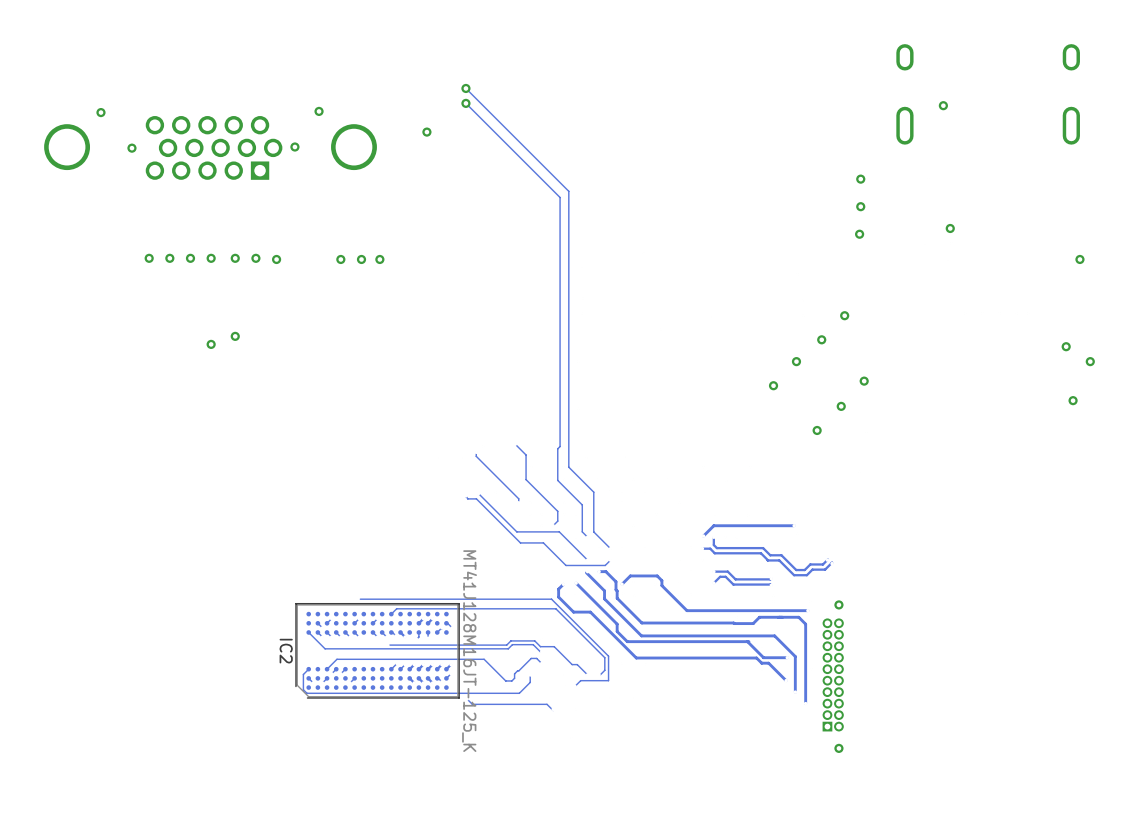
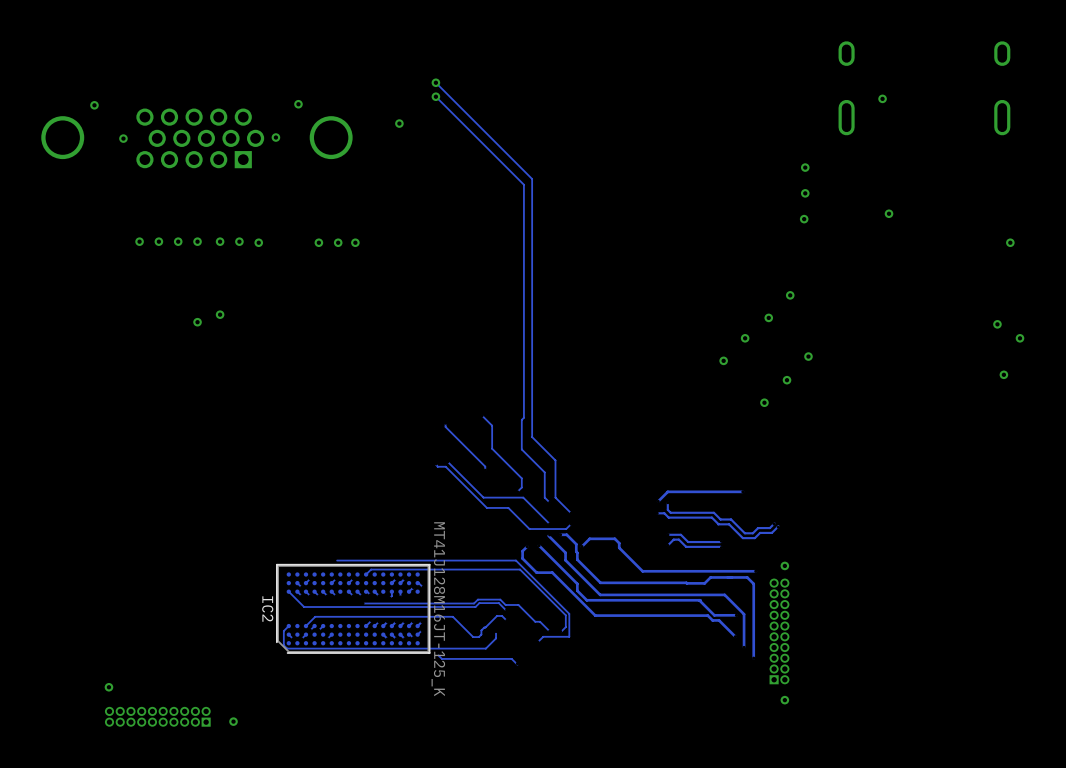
via: none -> (108, 687)
part: none -> (157, 716)
via: none -> (233, 721)

